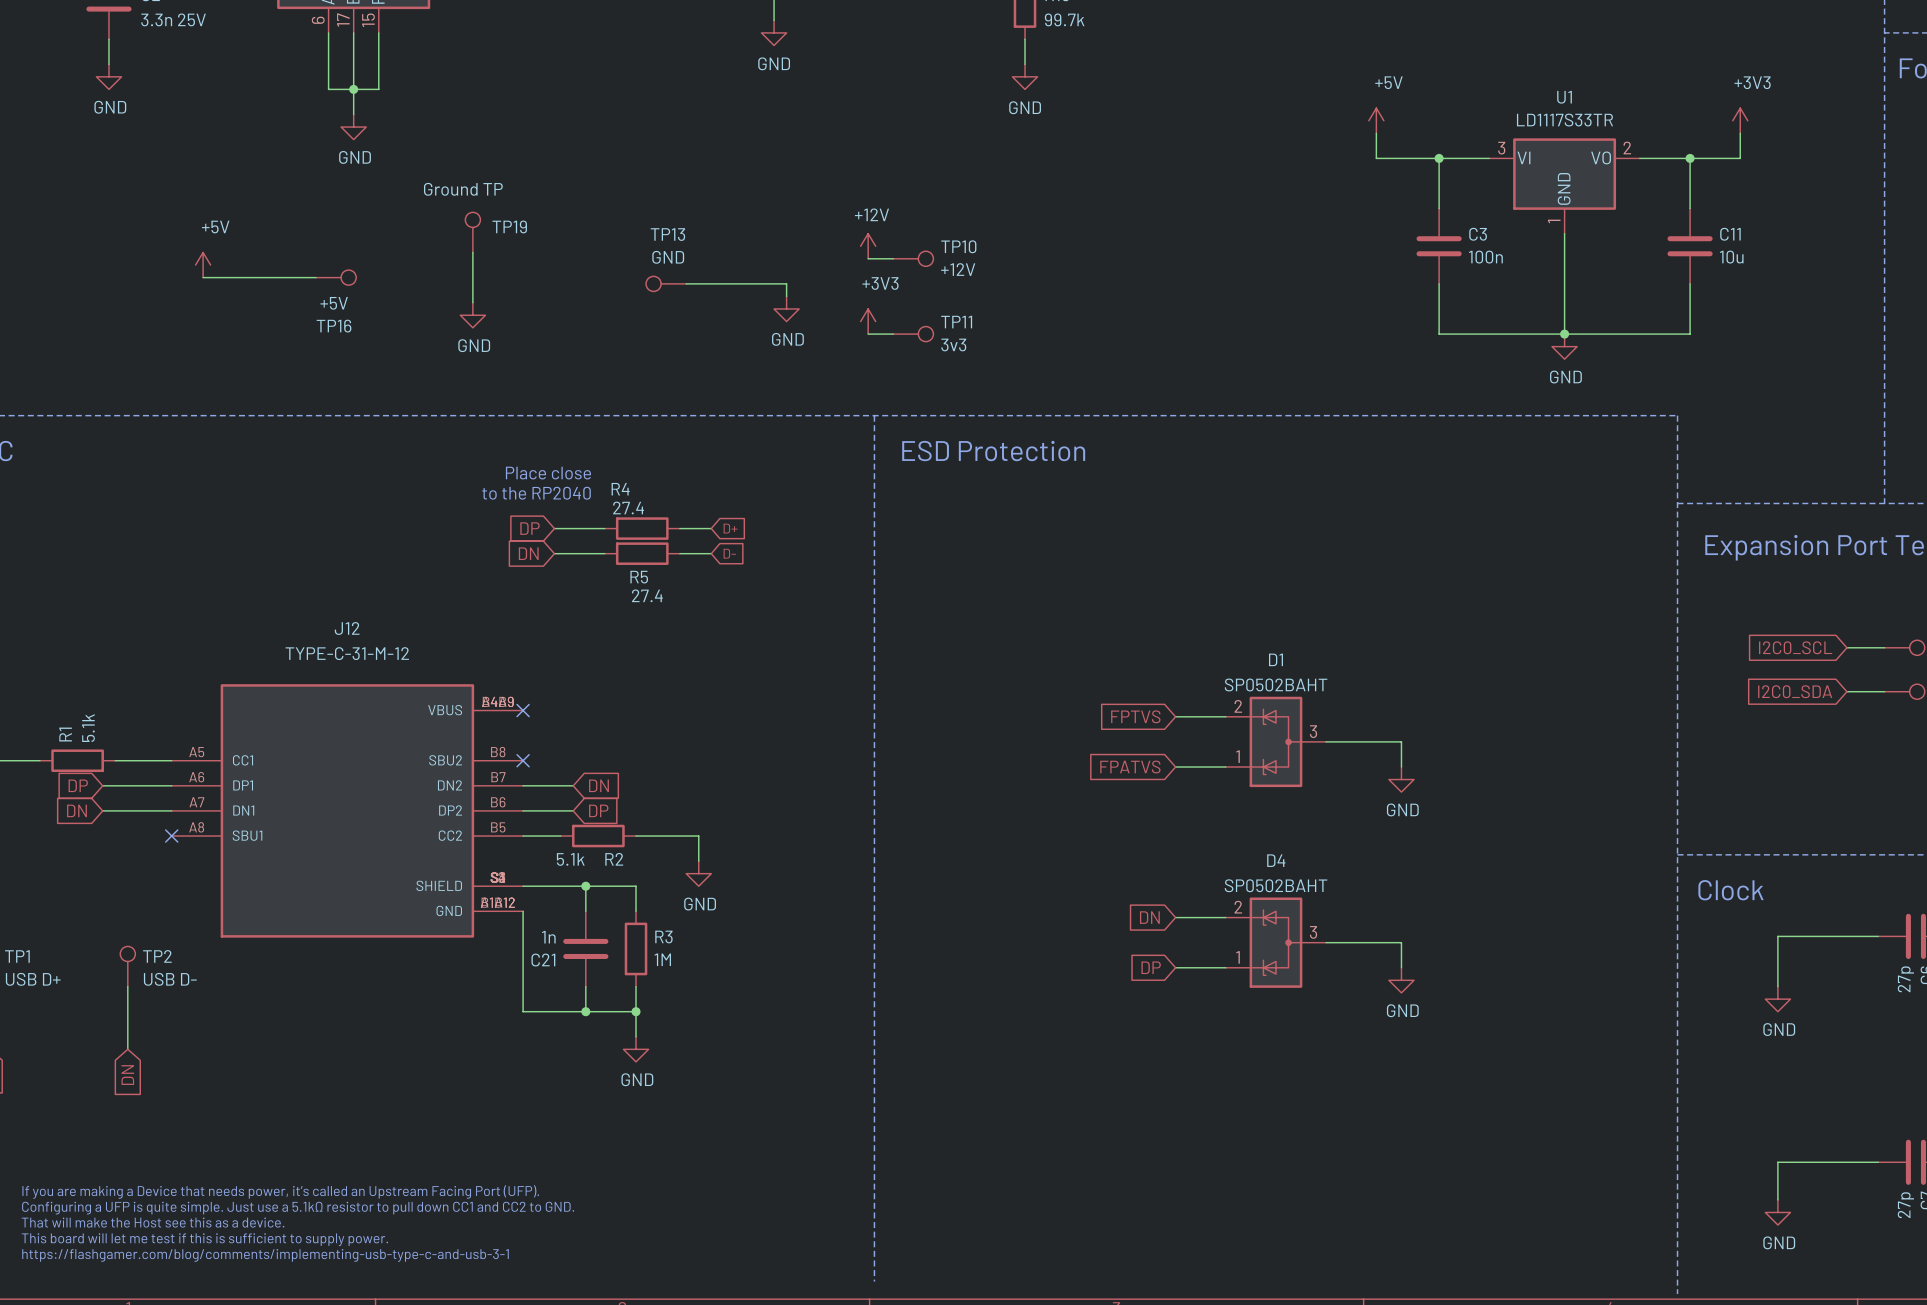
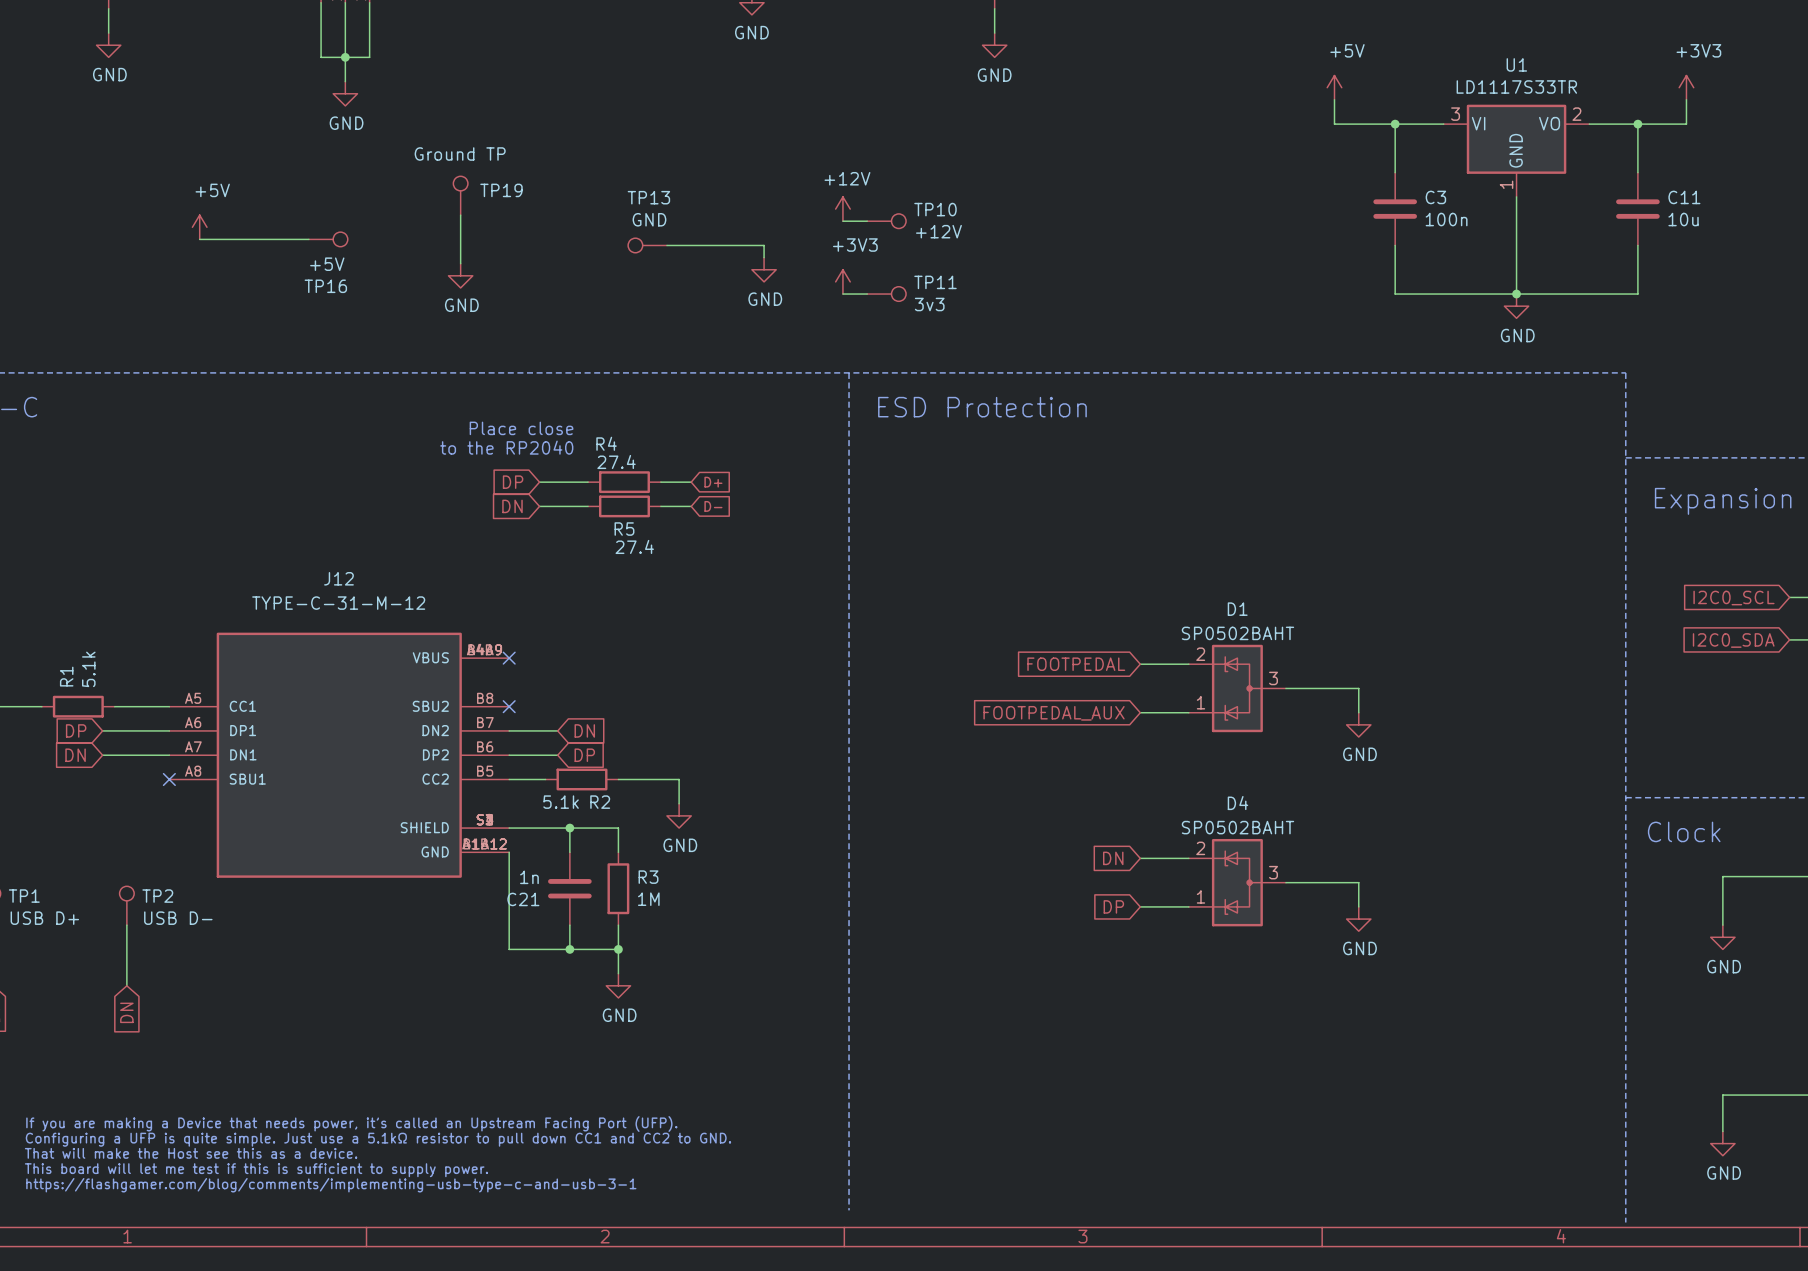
global label: FPTVS (1135, 716) -> FOOTPEDAL (1076, 664)
global label: FPATVS (1130, 767) -> FOOTPEDAL_AUX (1054, 713)

